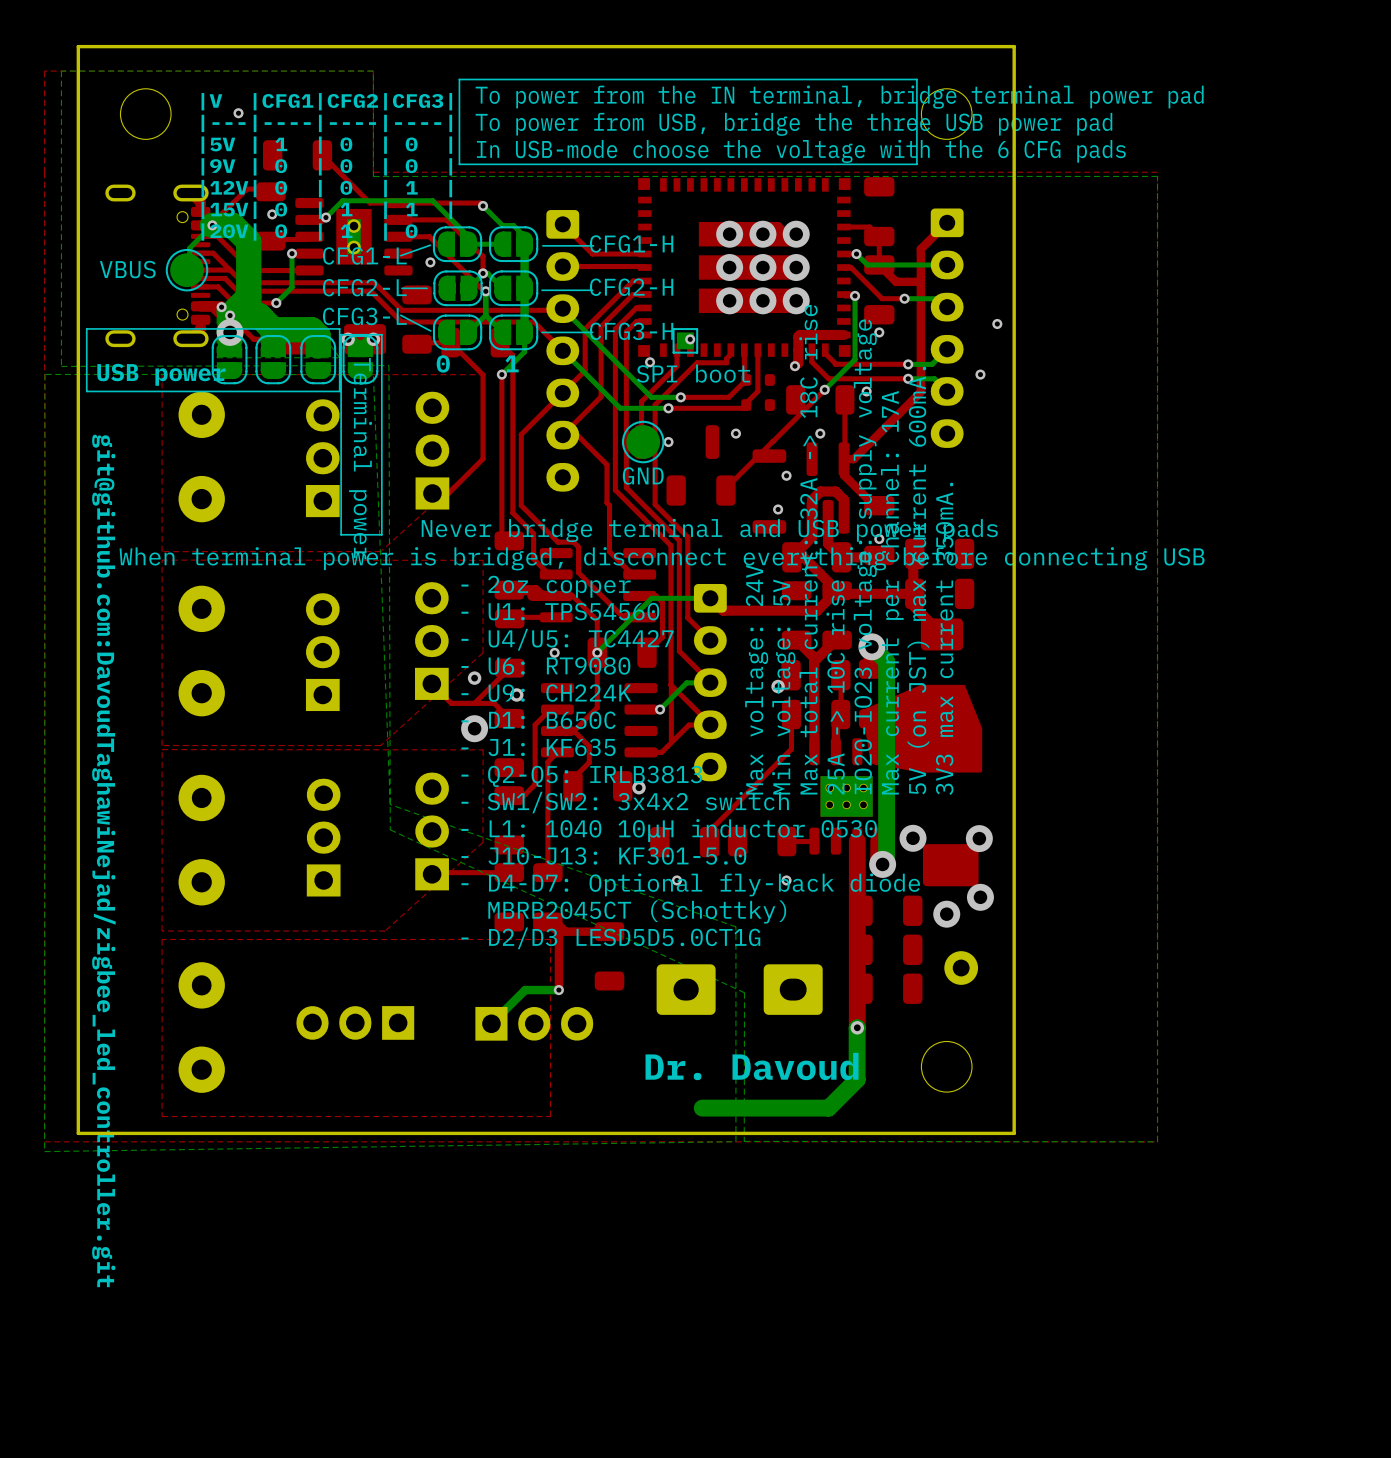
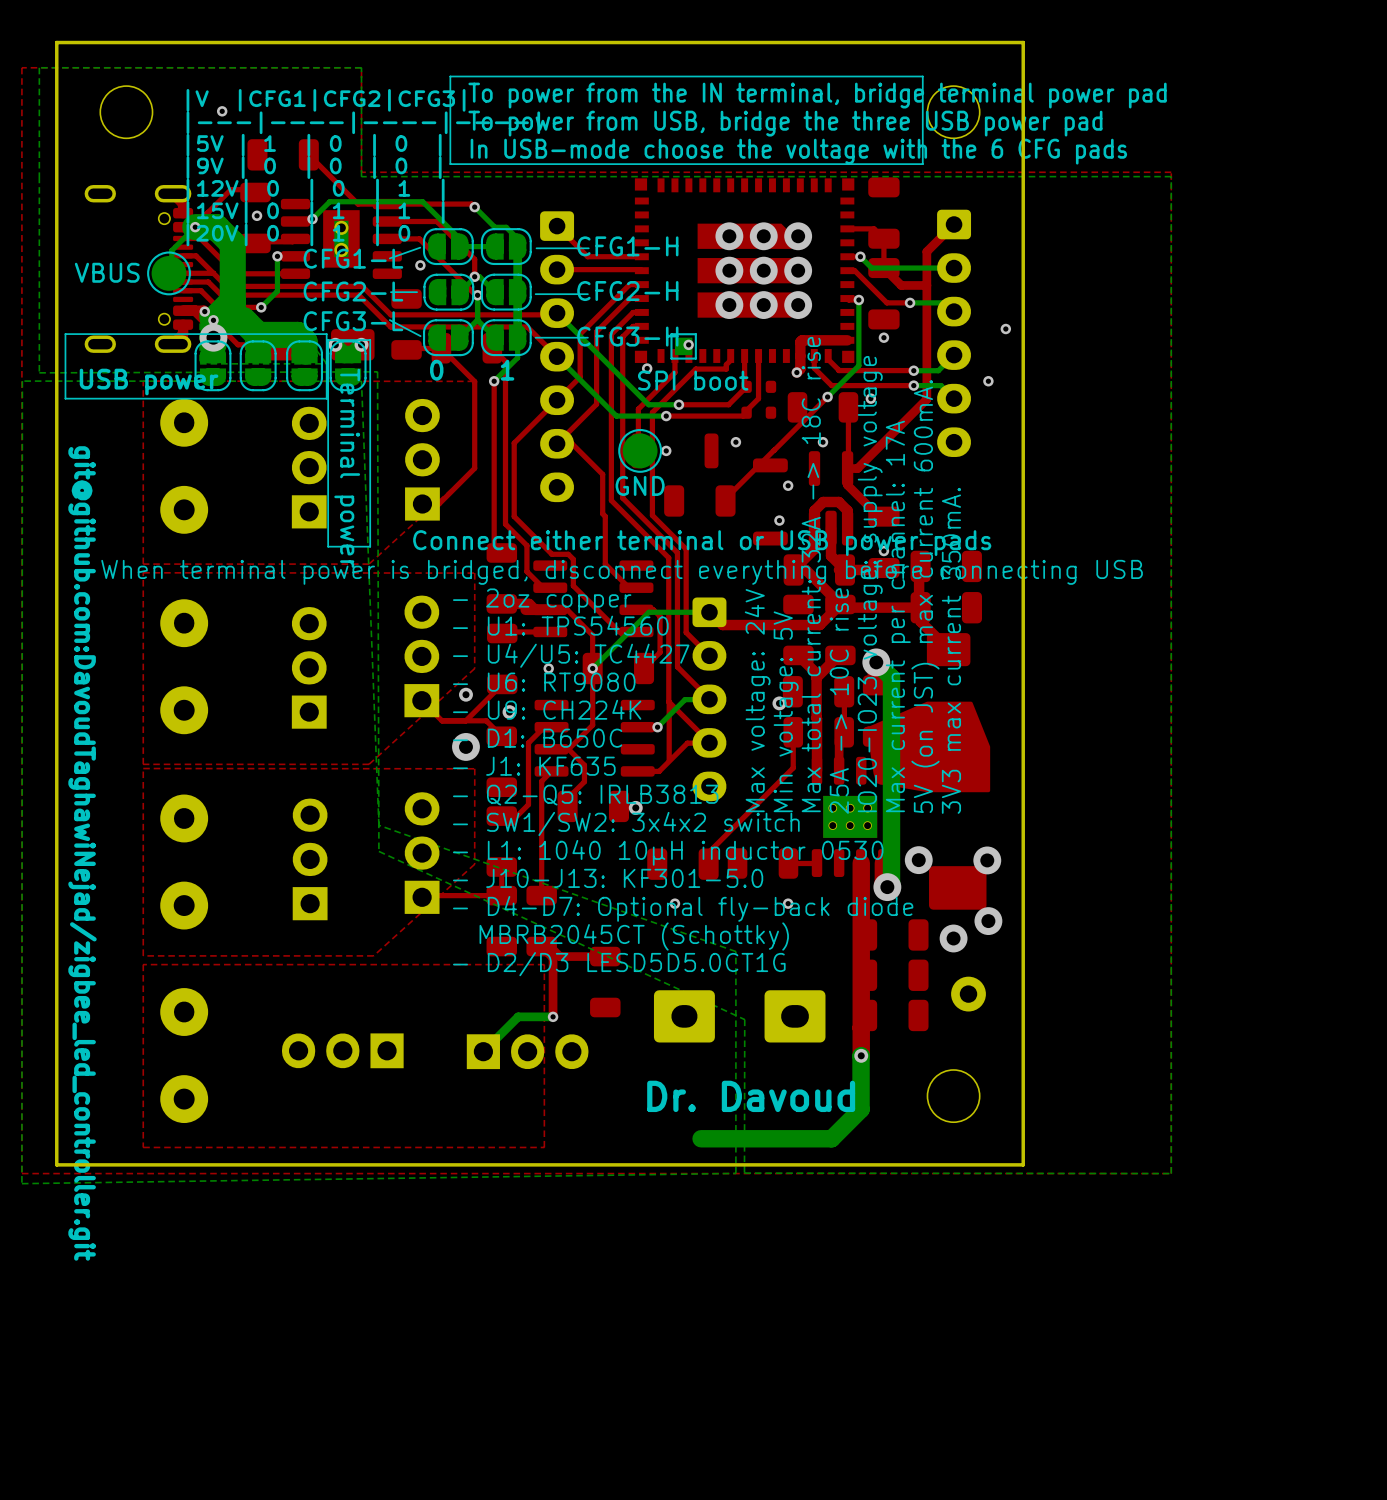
text: Never bridge terminal and USB power pads (709, 530) -> Connect either terminal or USB power pads (702, 543)

